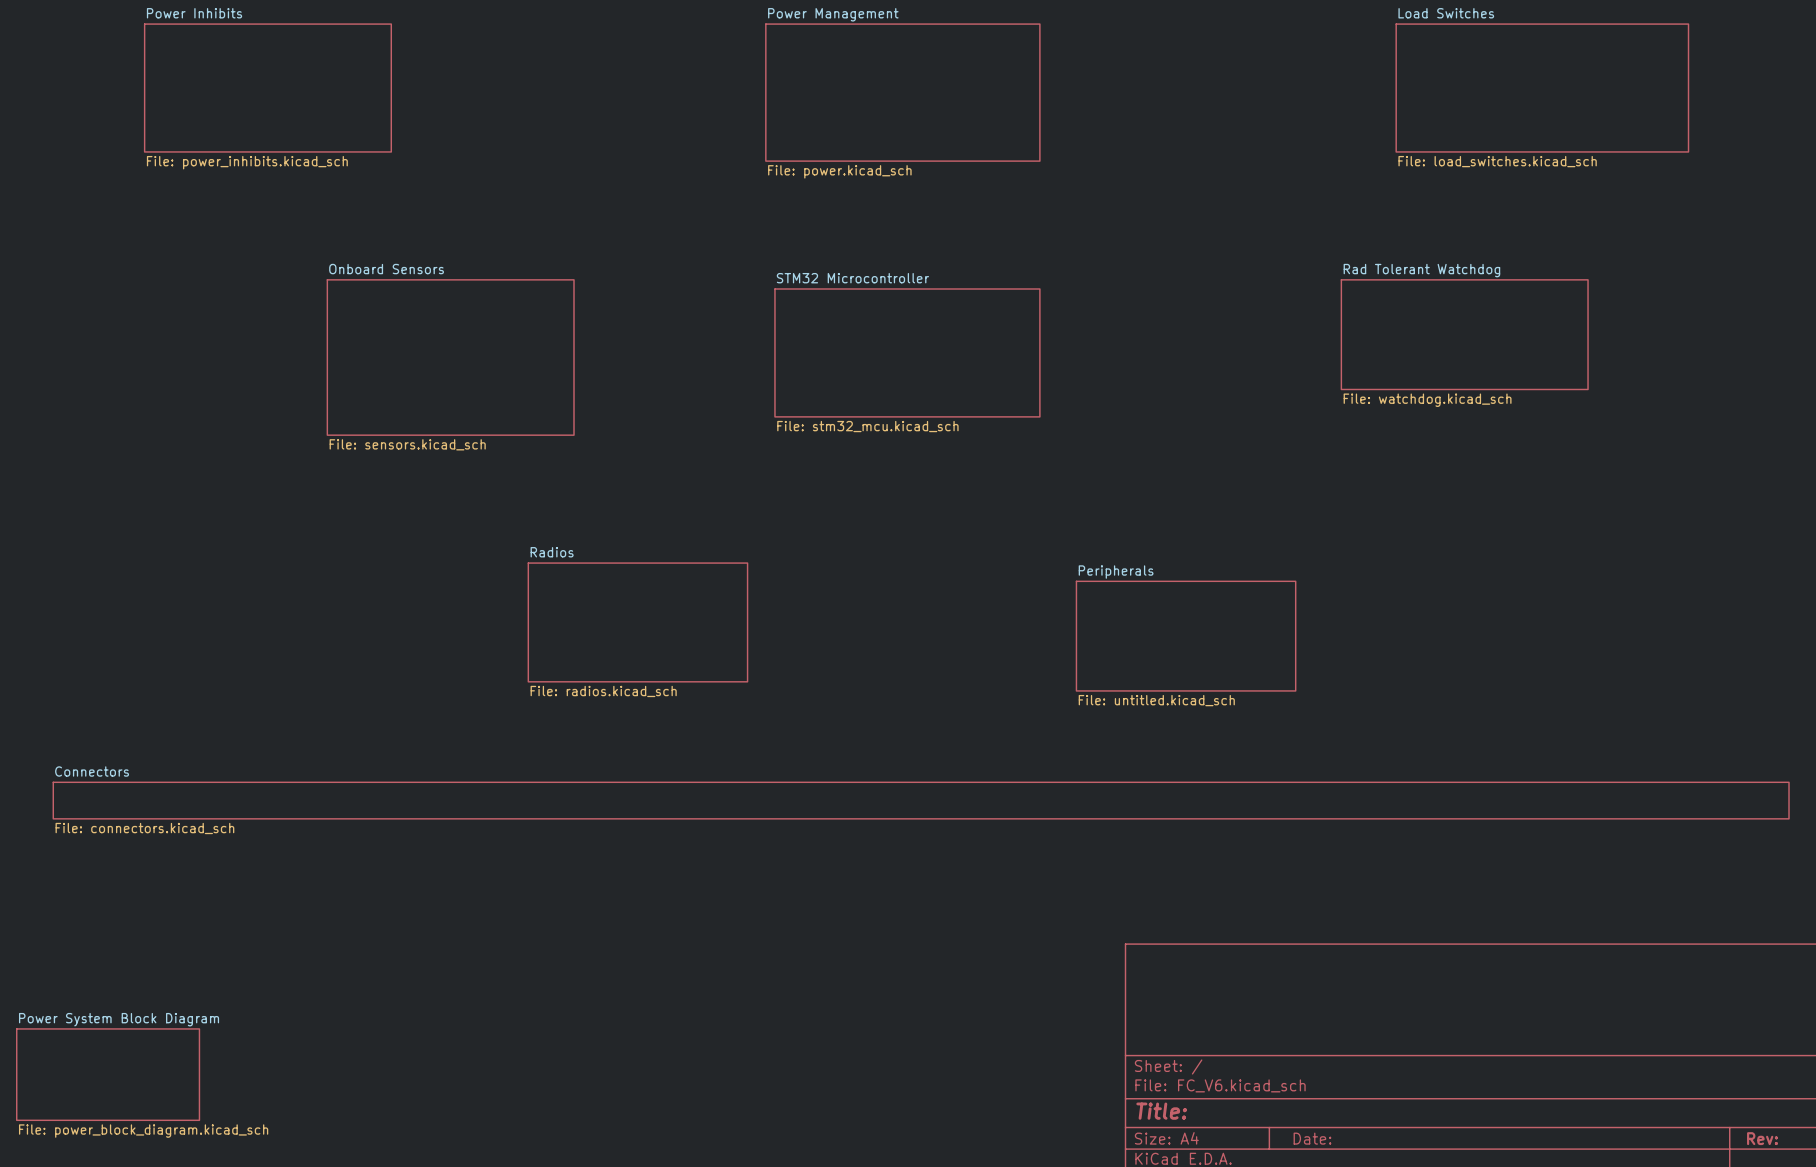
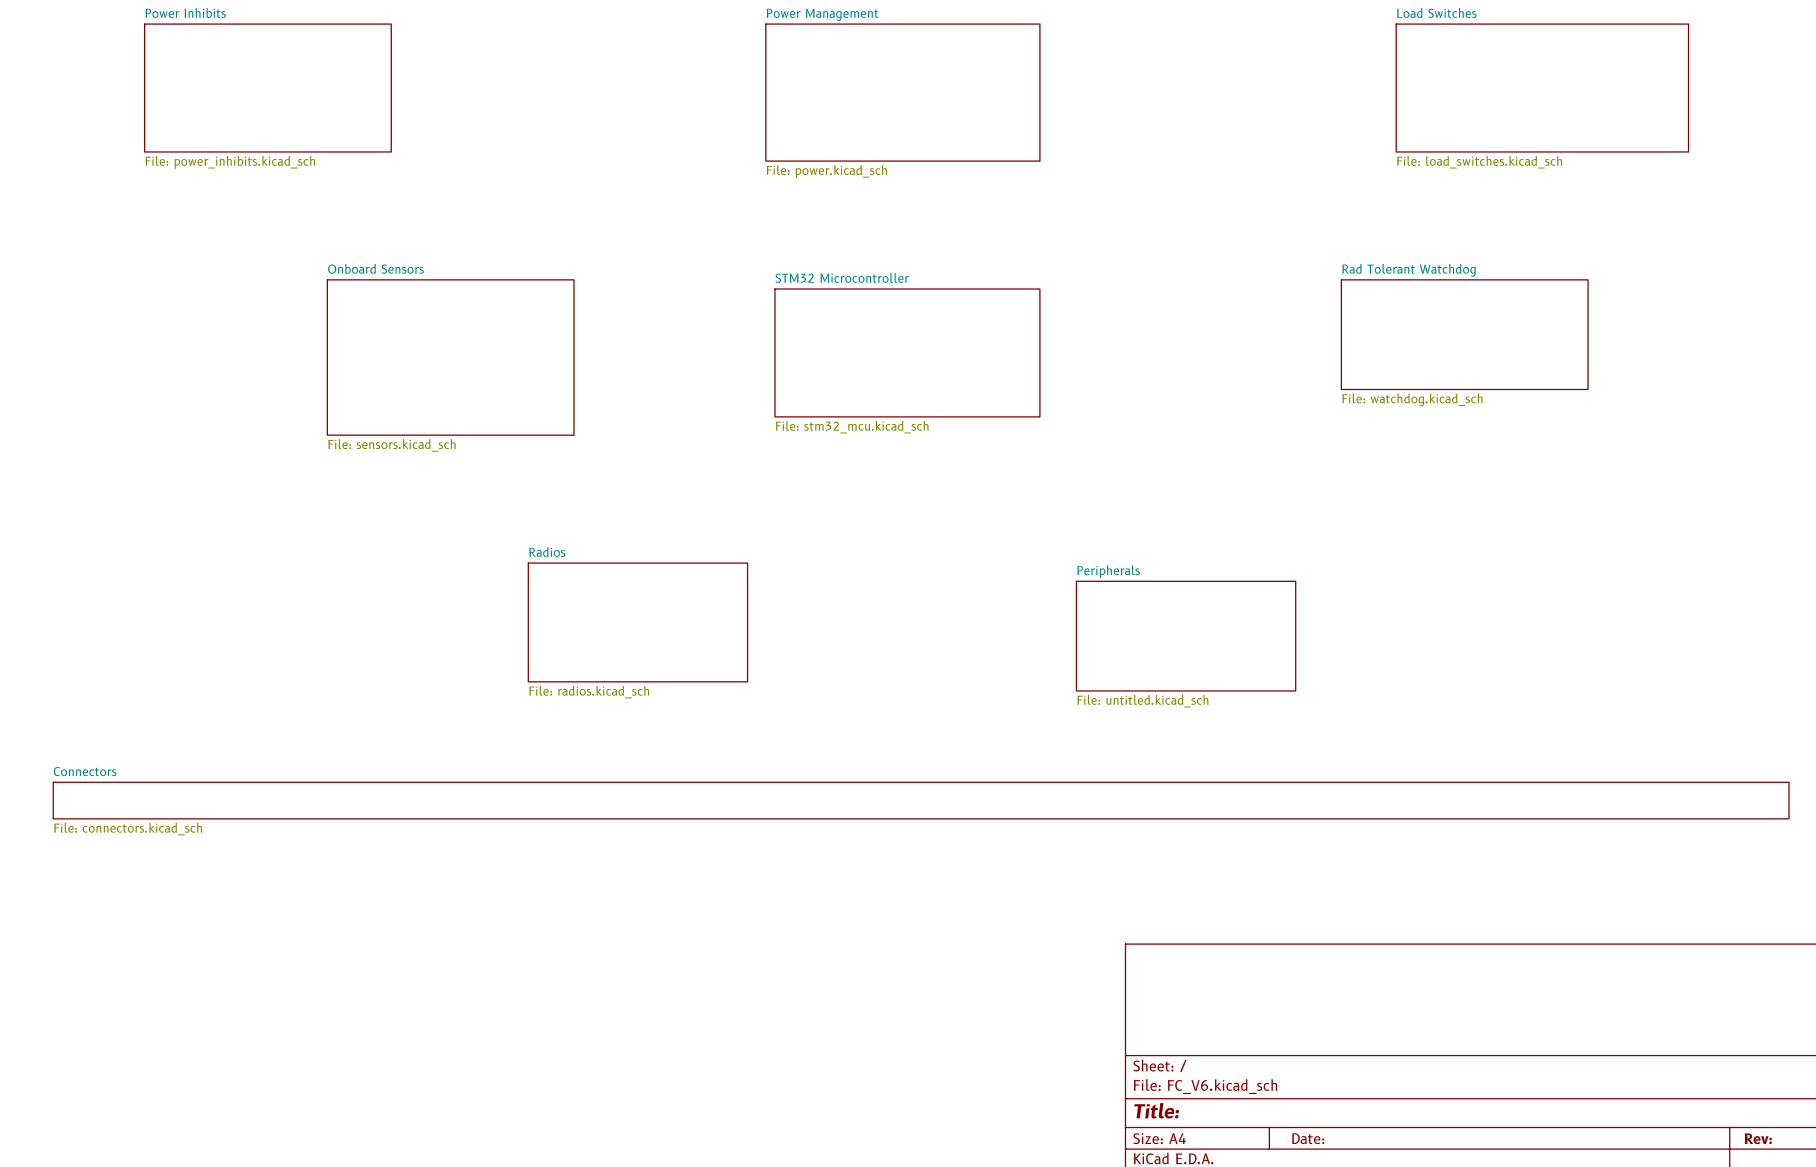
sheet Power System Block Diagram: File: power_block_diagram.kicad_sch (108, 1074) -> none

